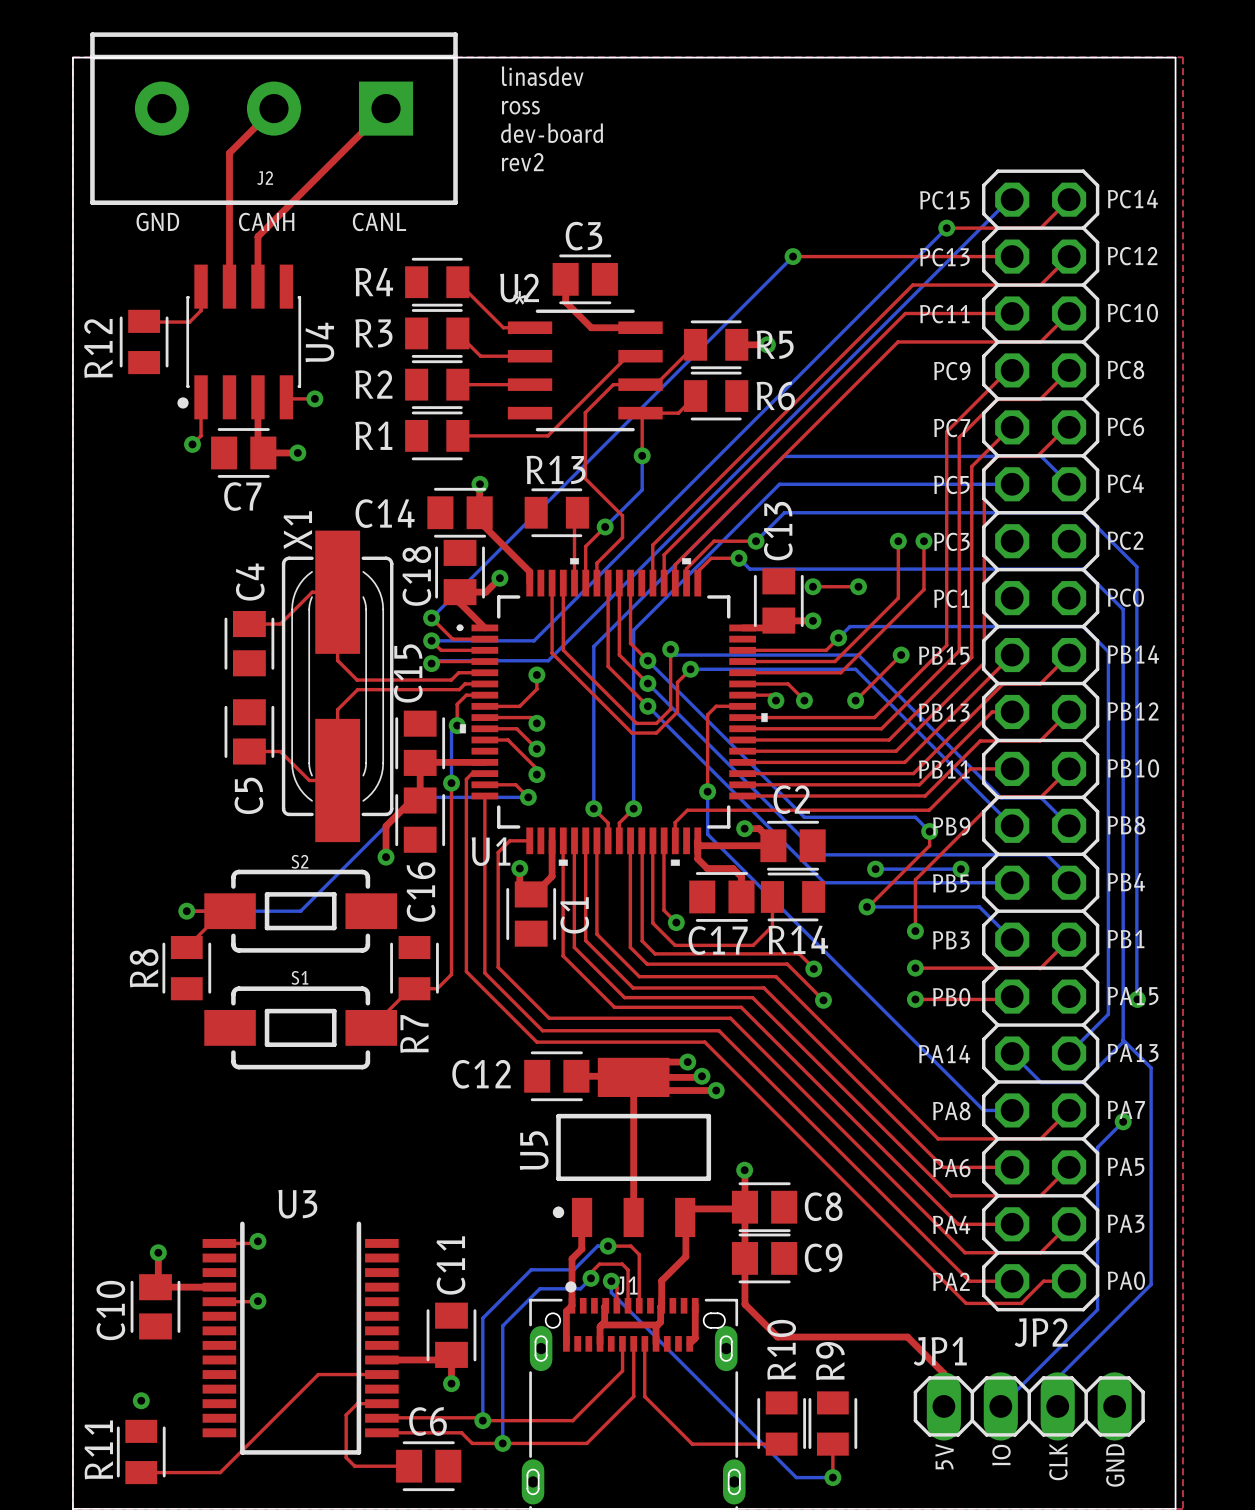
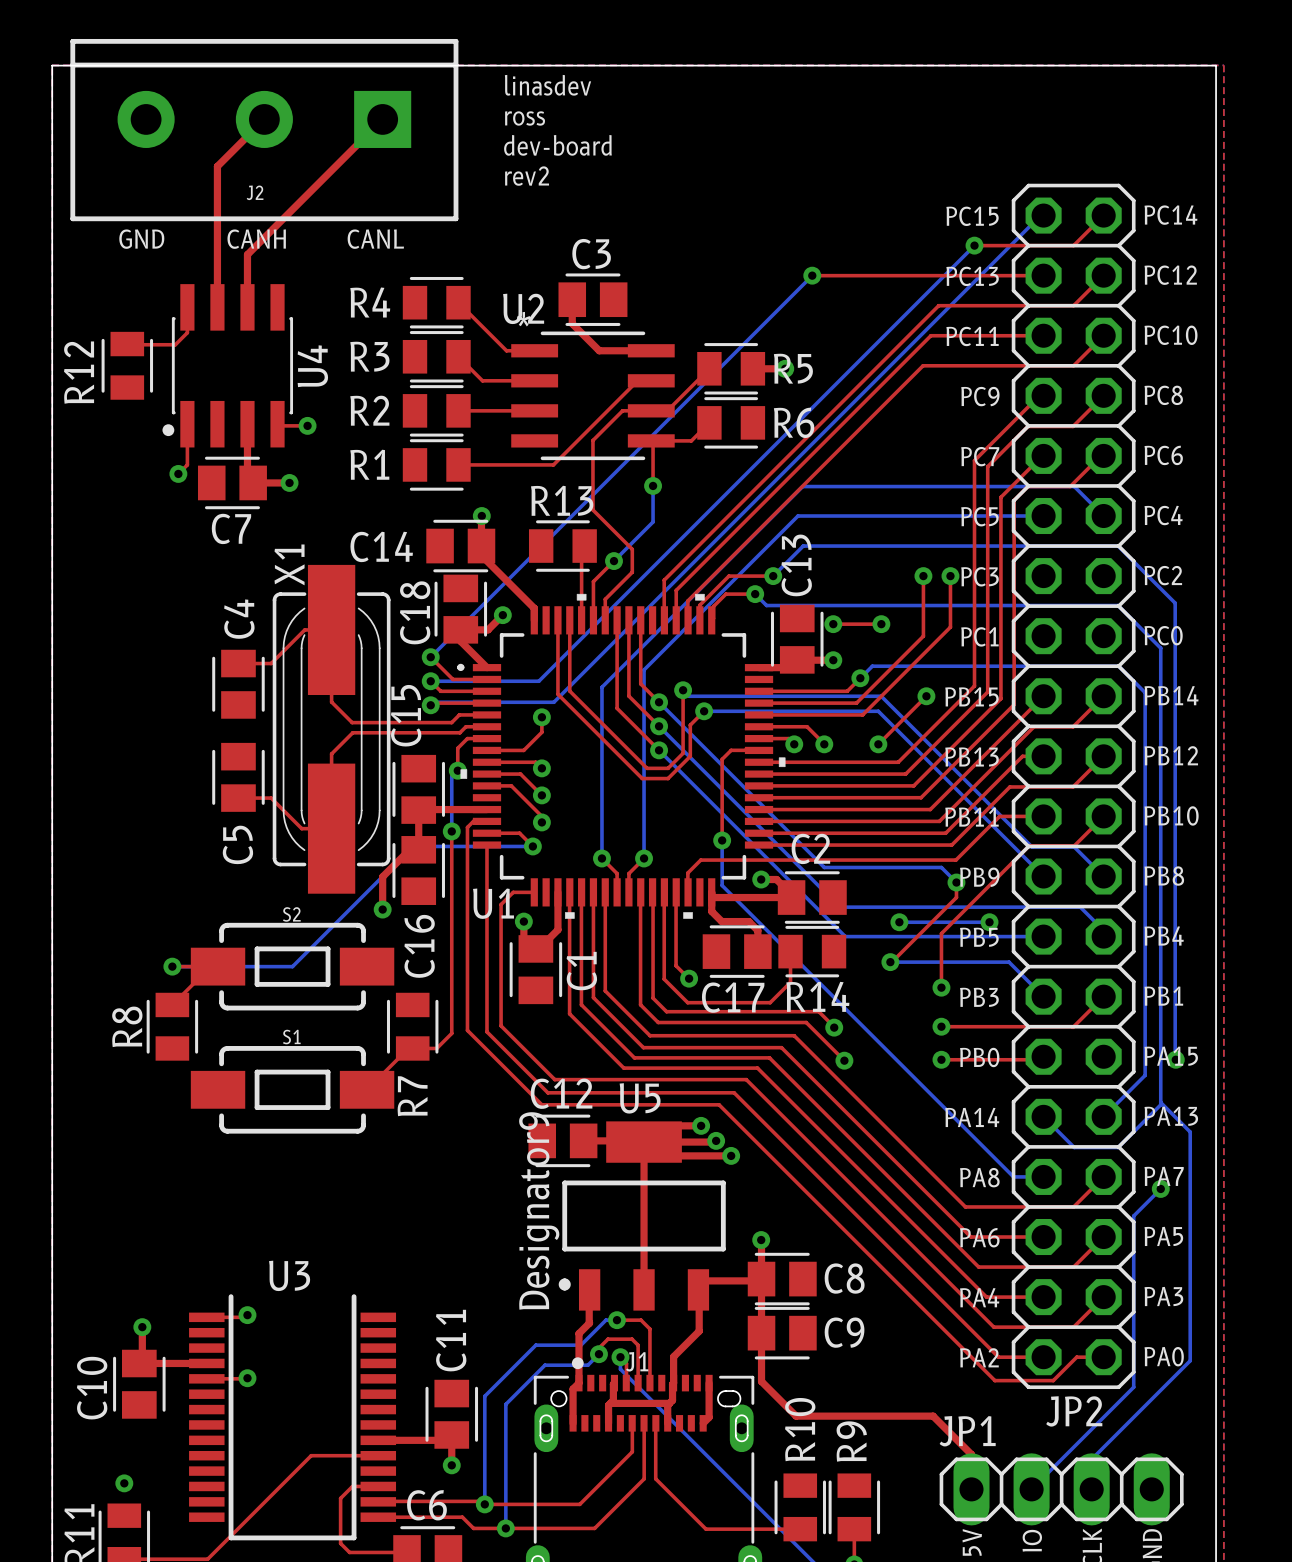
C12 name position: C12 (481, 1074) -> C12 (561, 1093)
U5 text: none -> Designator9 (539, 1210)
U5 name rotation: 0° (534, 1150) -> 90° clockwise (640, 1098)
U5 name position: U5 (534, 1150) -> U5 (640, 1098)

